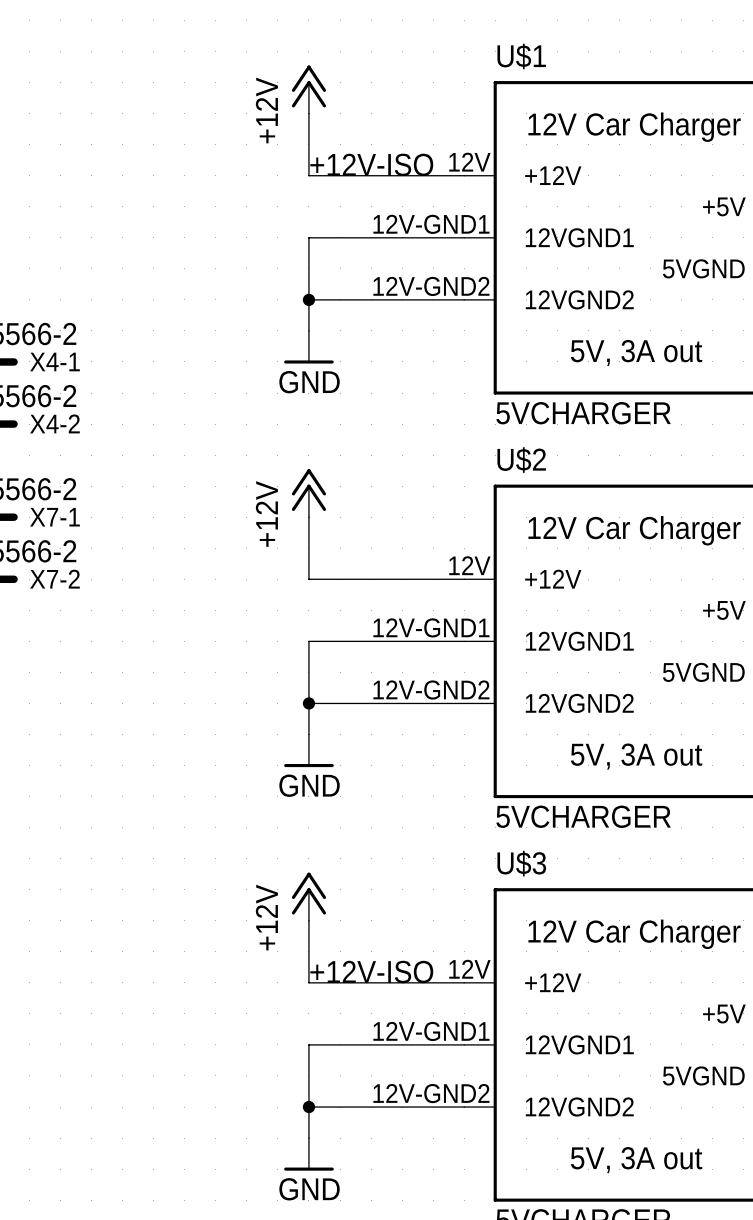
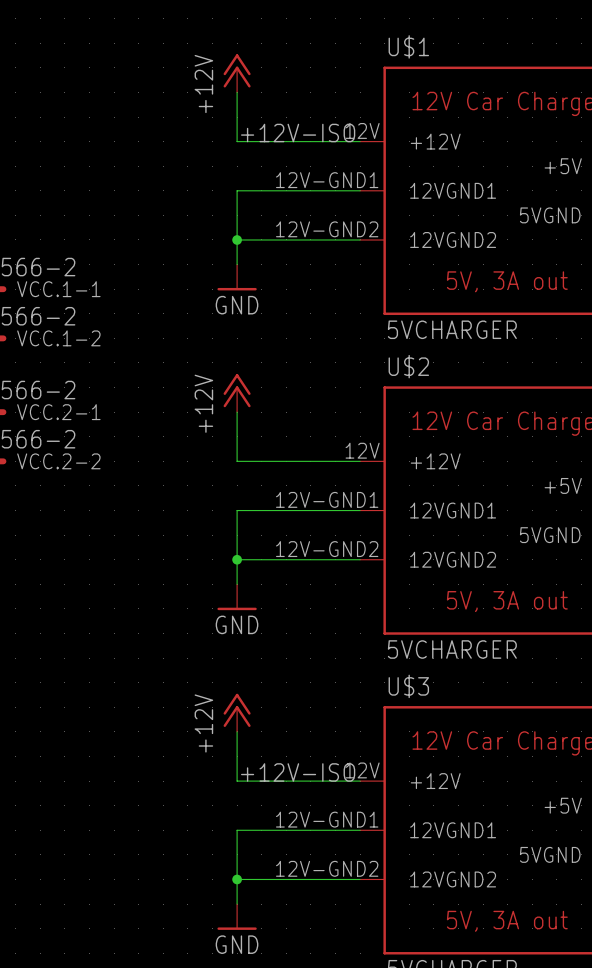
X4-1 name: X4-1 (54, 361) -> VCC.1-1 (58, 289)
X4-2 name: X4-2 (54, 423) -> VCC.1-2 (58, 338)
X7-1 name: X7-1 (54, 517) -> VCC.2-1 (58, 412)
X7-2 name: X7-2 (54, 579) -> VCC.2-2 (58, 461)

